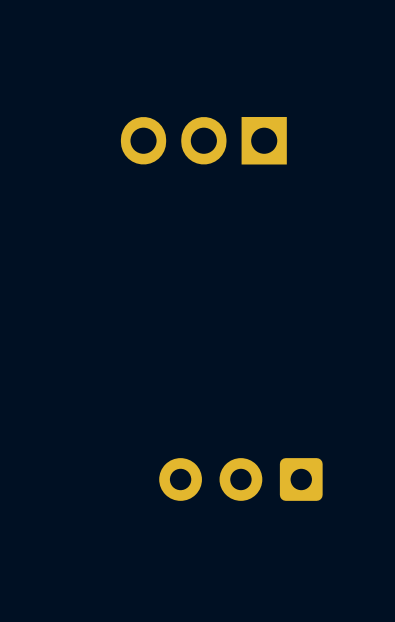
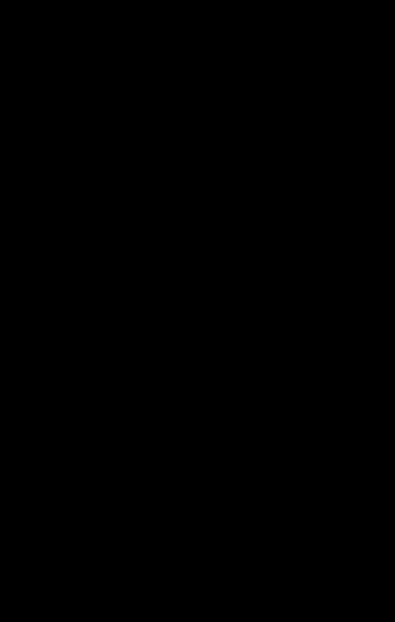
part: (203, 140) -> none
part: (240, 479) -> none

